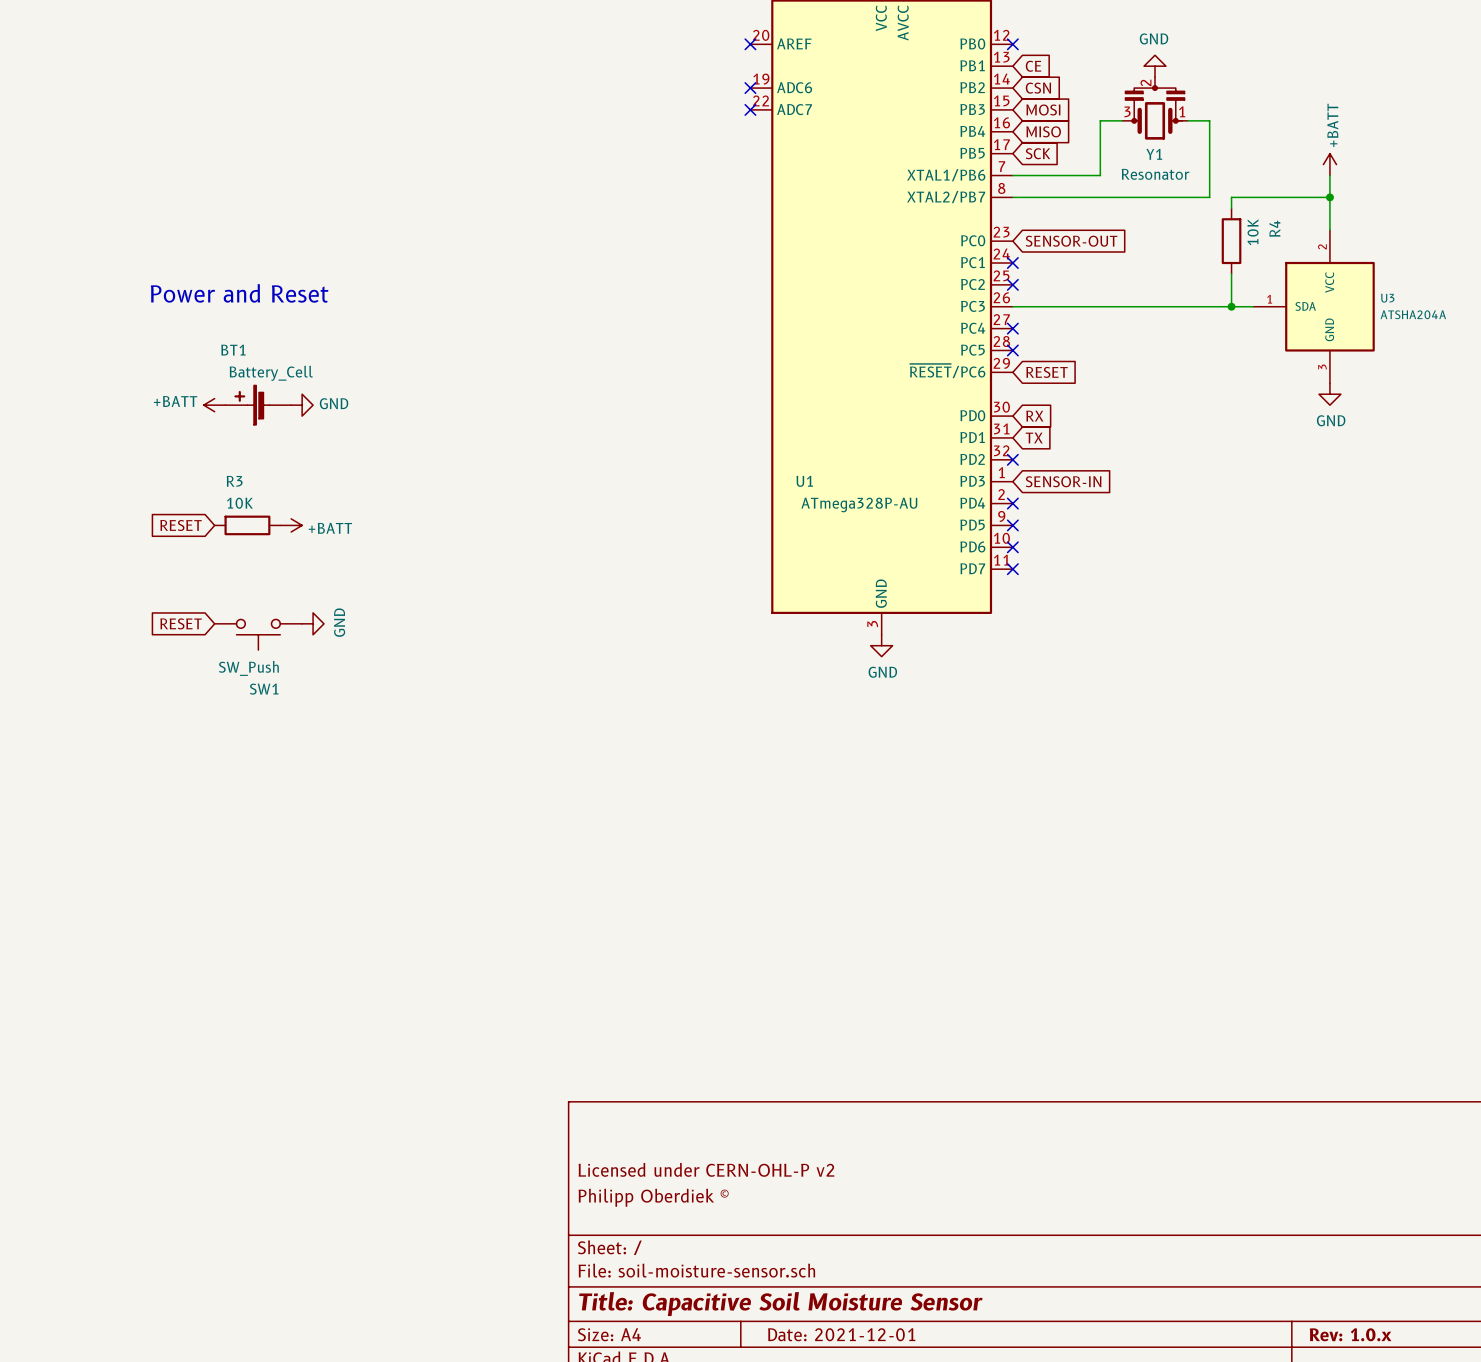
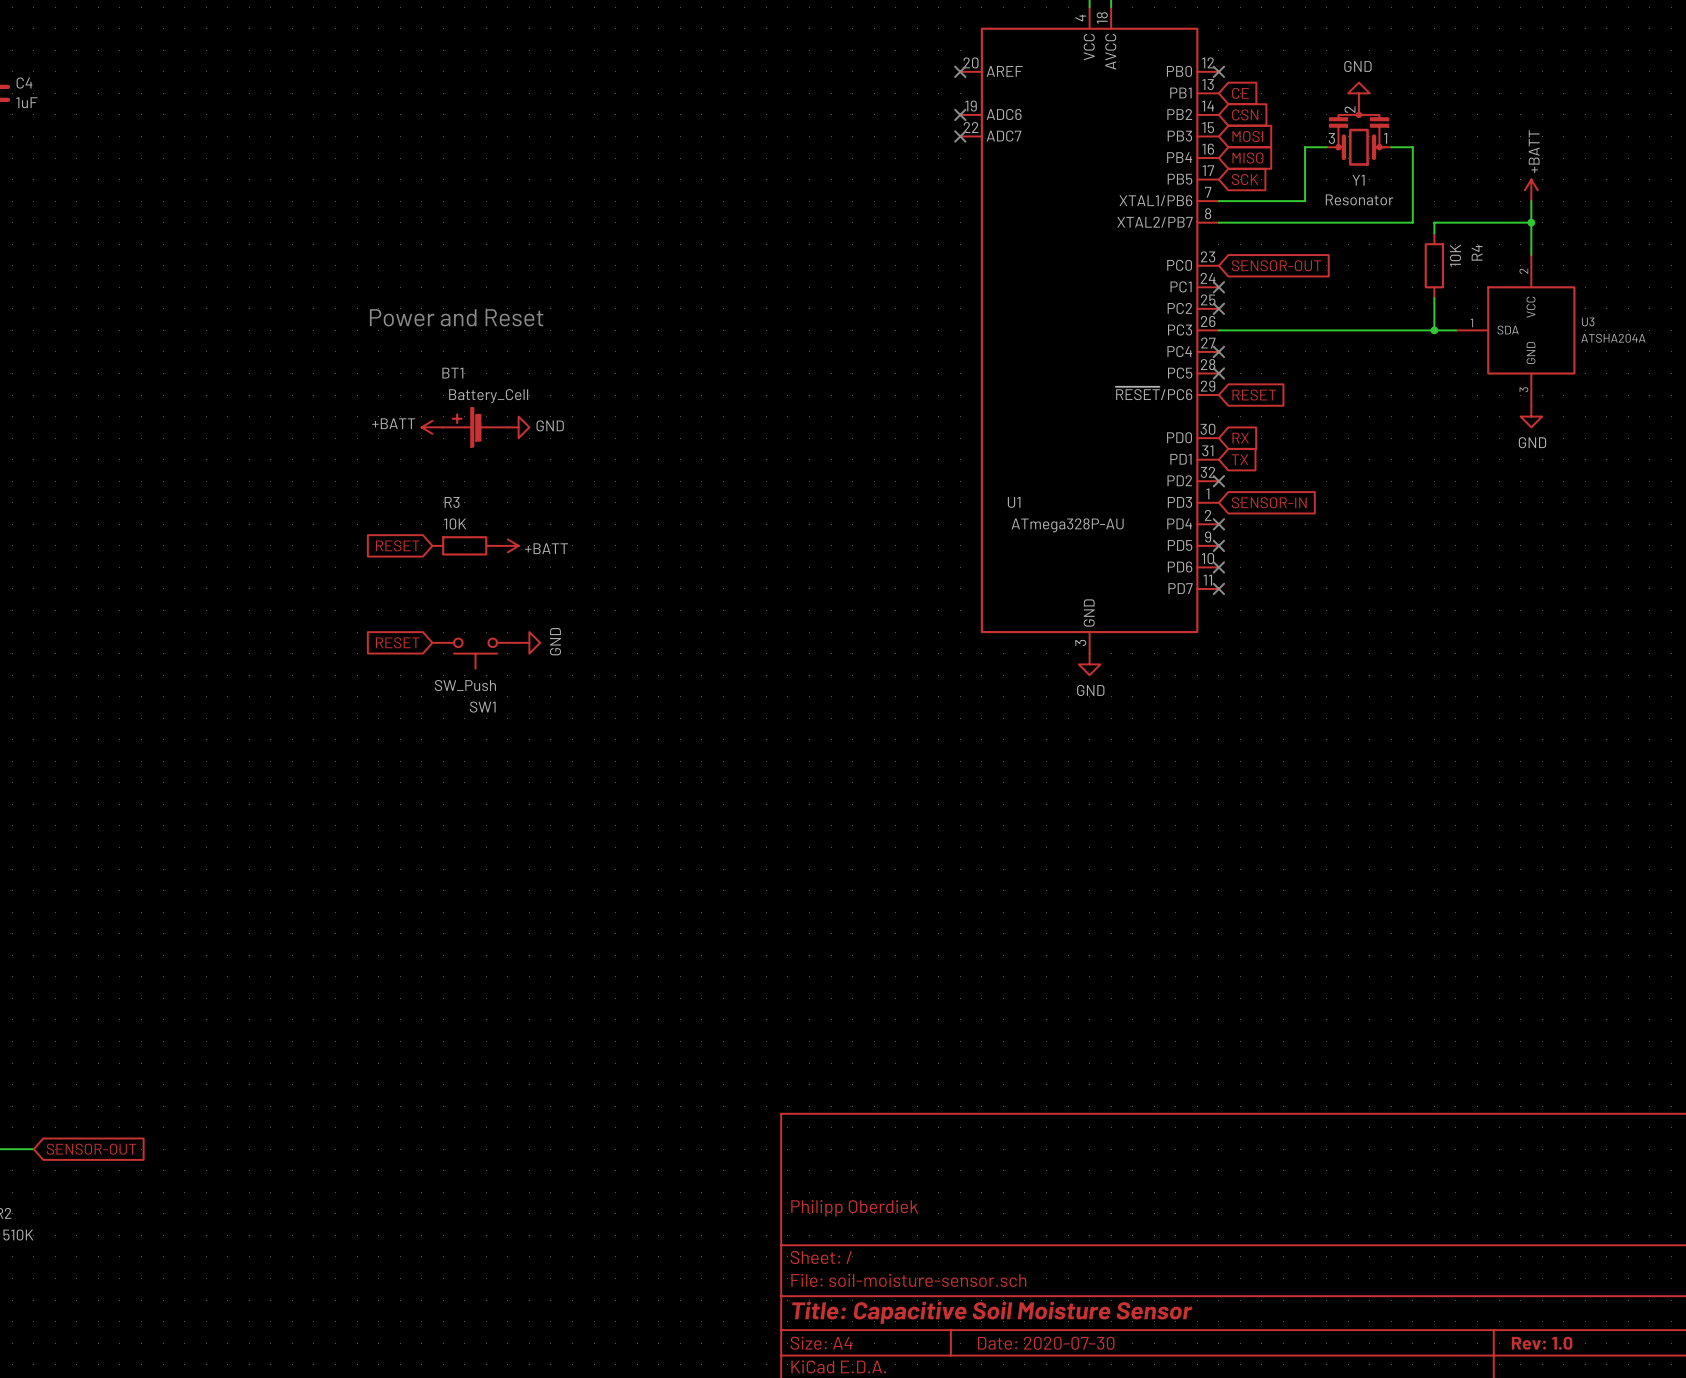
title block: Licensed under CERN-OHL-P v2 (706, 1169) -> none
title block: Philipp Oberdiek © (653, 1197) -> Philipp Oberdiek (854, 1208)
title block: Date: 2021-12-01 (841, 1334) -> Date: 2020-07-30 (1046, 1343)
title block: Rev: 1.0.x (1350, 1334) -> Rev: 1.0 (1542, 1343)

